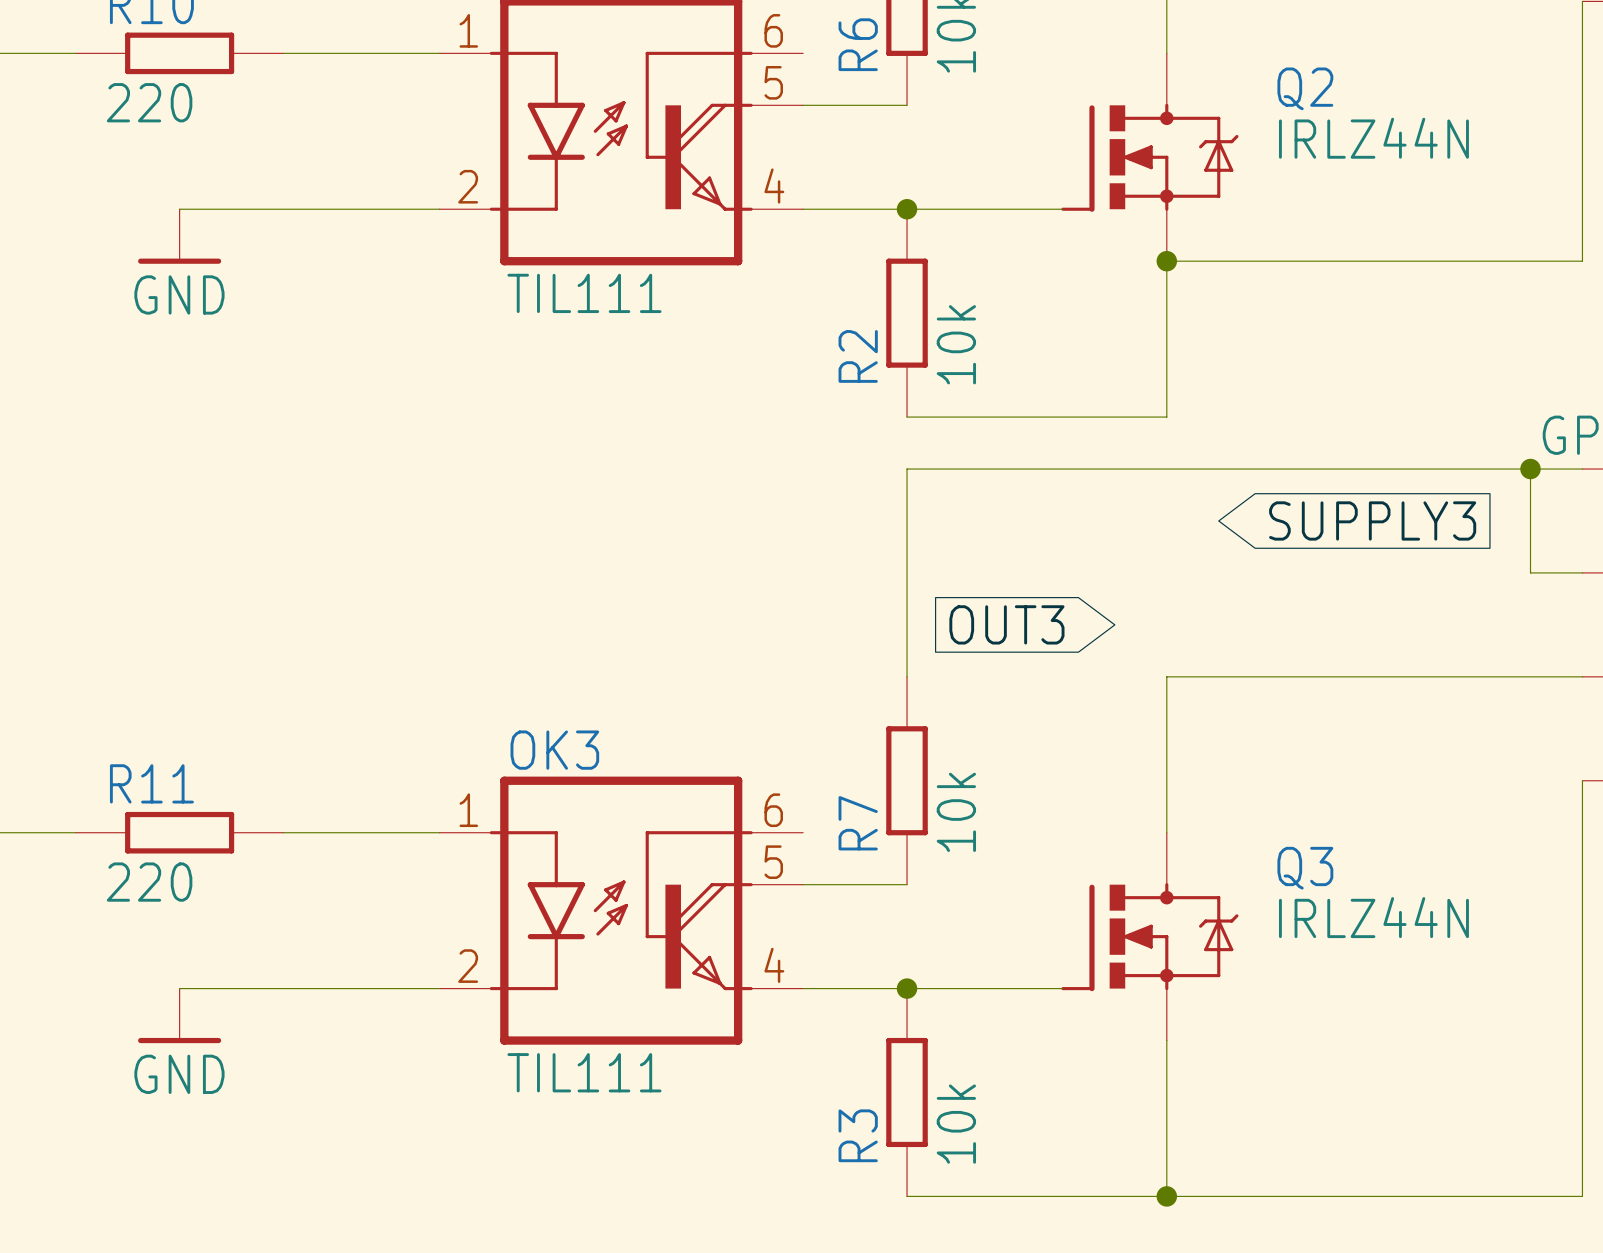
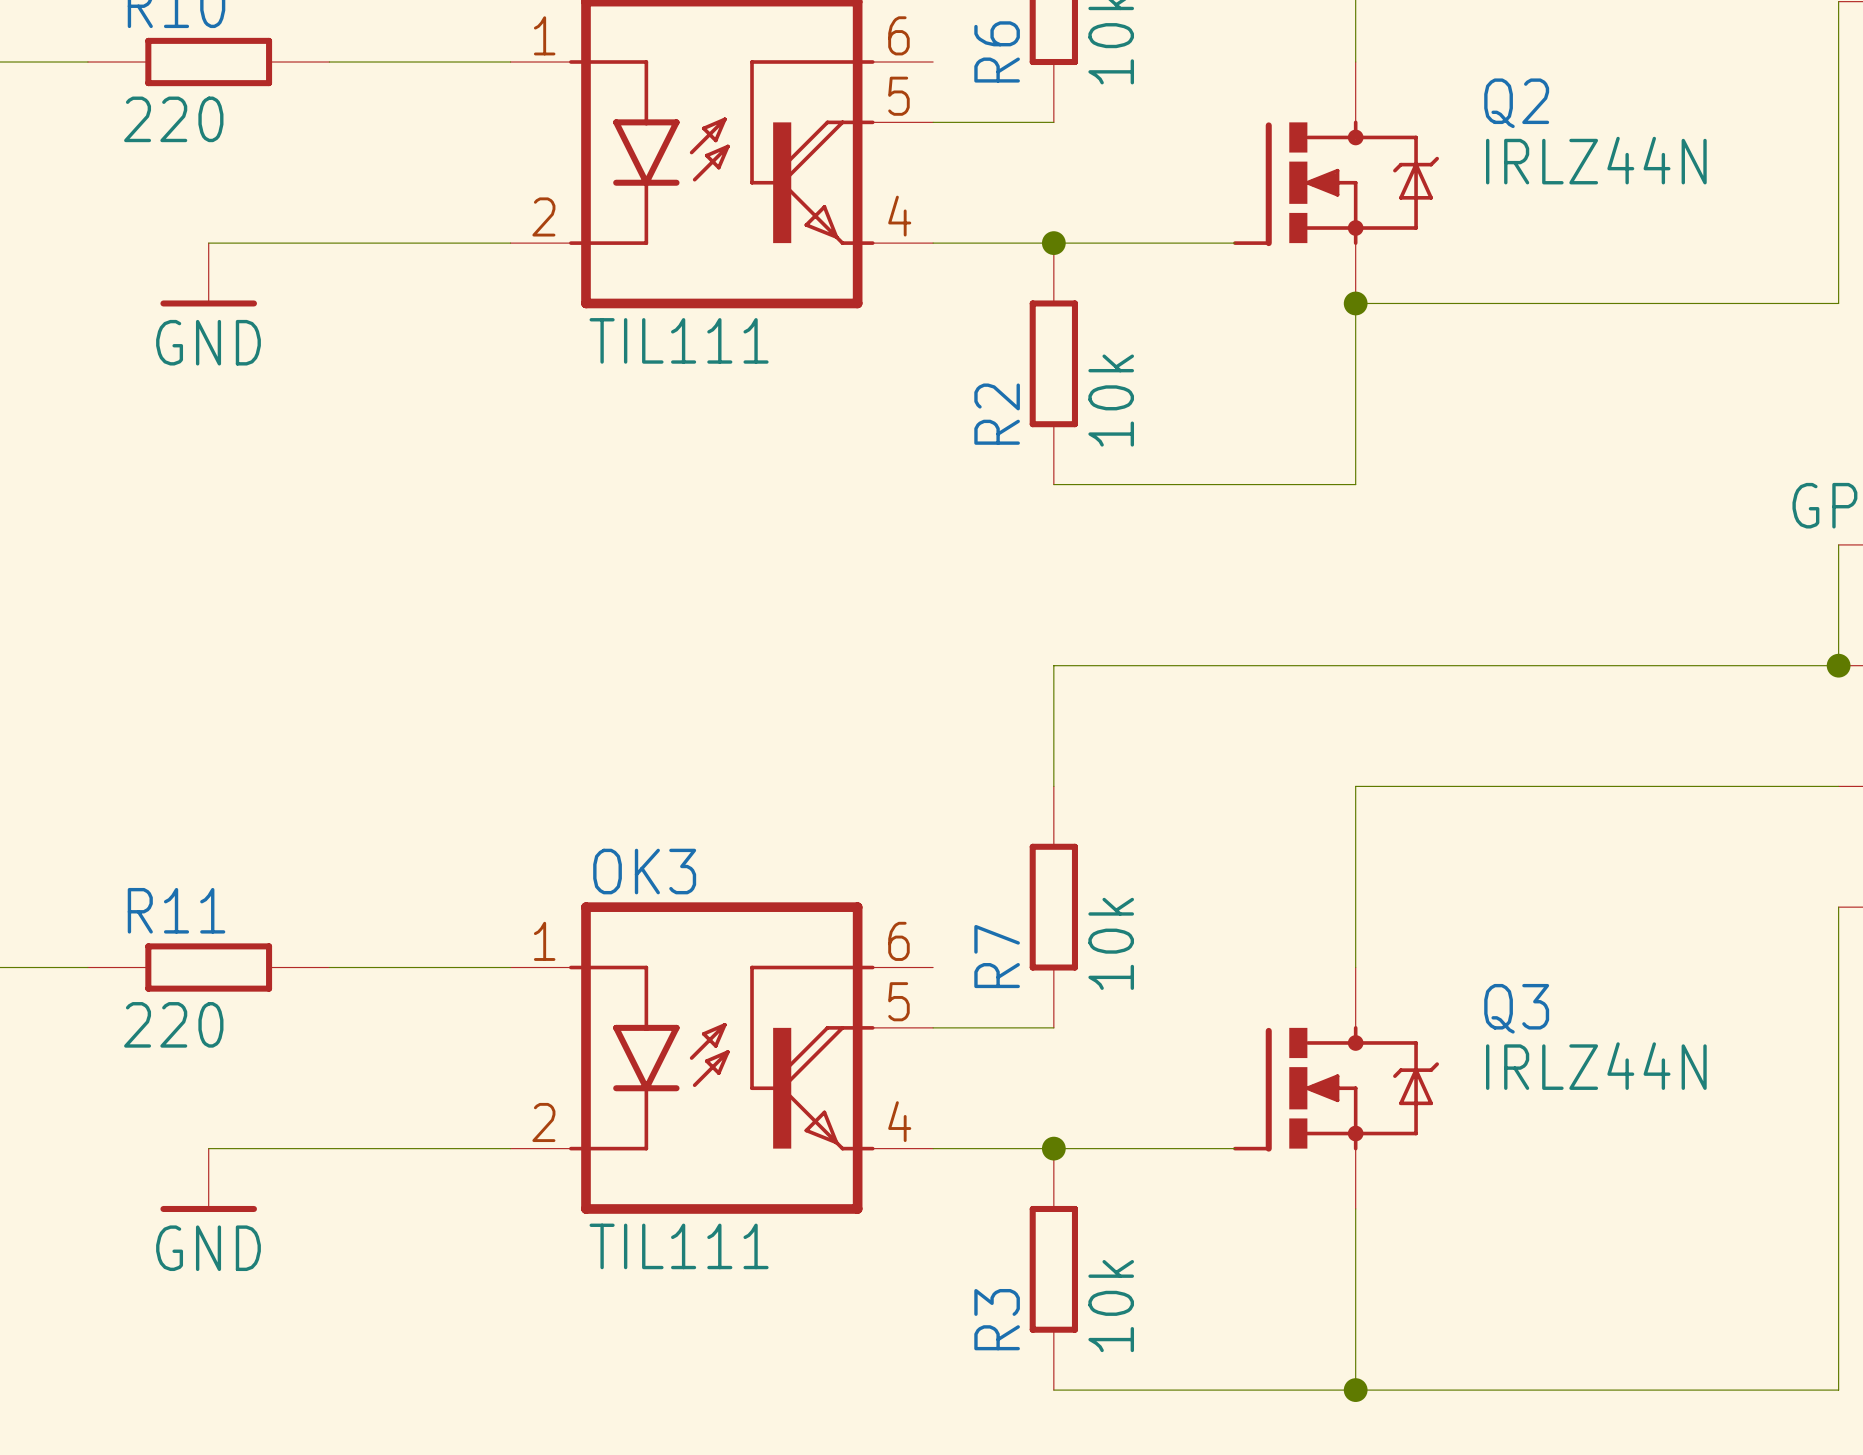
wire: (1530, 469) (1530, 572) -> (1838, 544) (1838, 665)
junction position: (1530, 469) -> (1838, 665)
wire: (1582, 469) (907, 469) (907, 572) -> (1778, 665) (1053, 665)
global label: SUPPLY3 (1372, 520) -> none
global label: OUT3 (1006, 624) -> none

